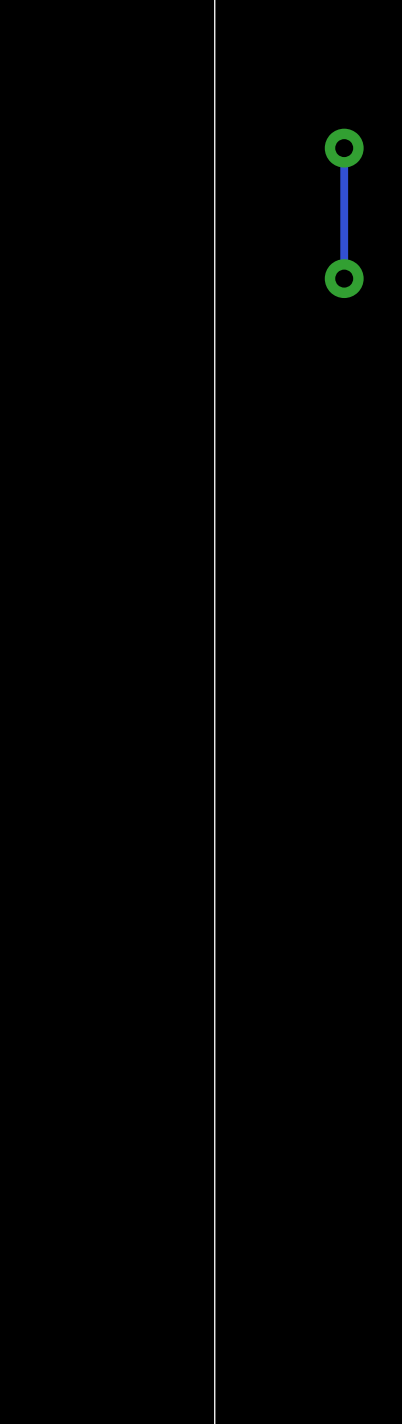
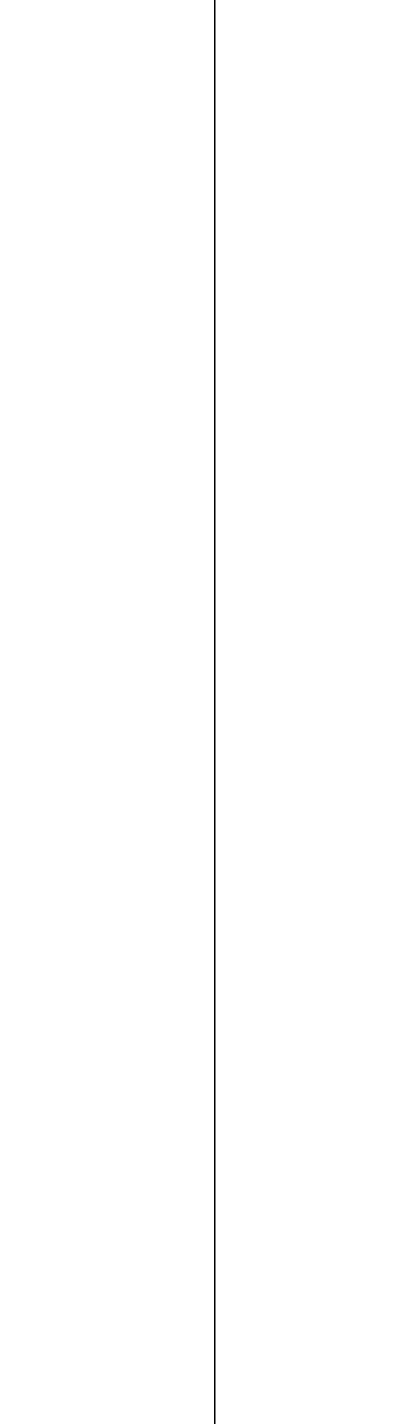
track: (344, 148) (344, 278) -> none
via: (344, 148) -> none
via: (344, 278) -> none

